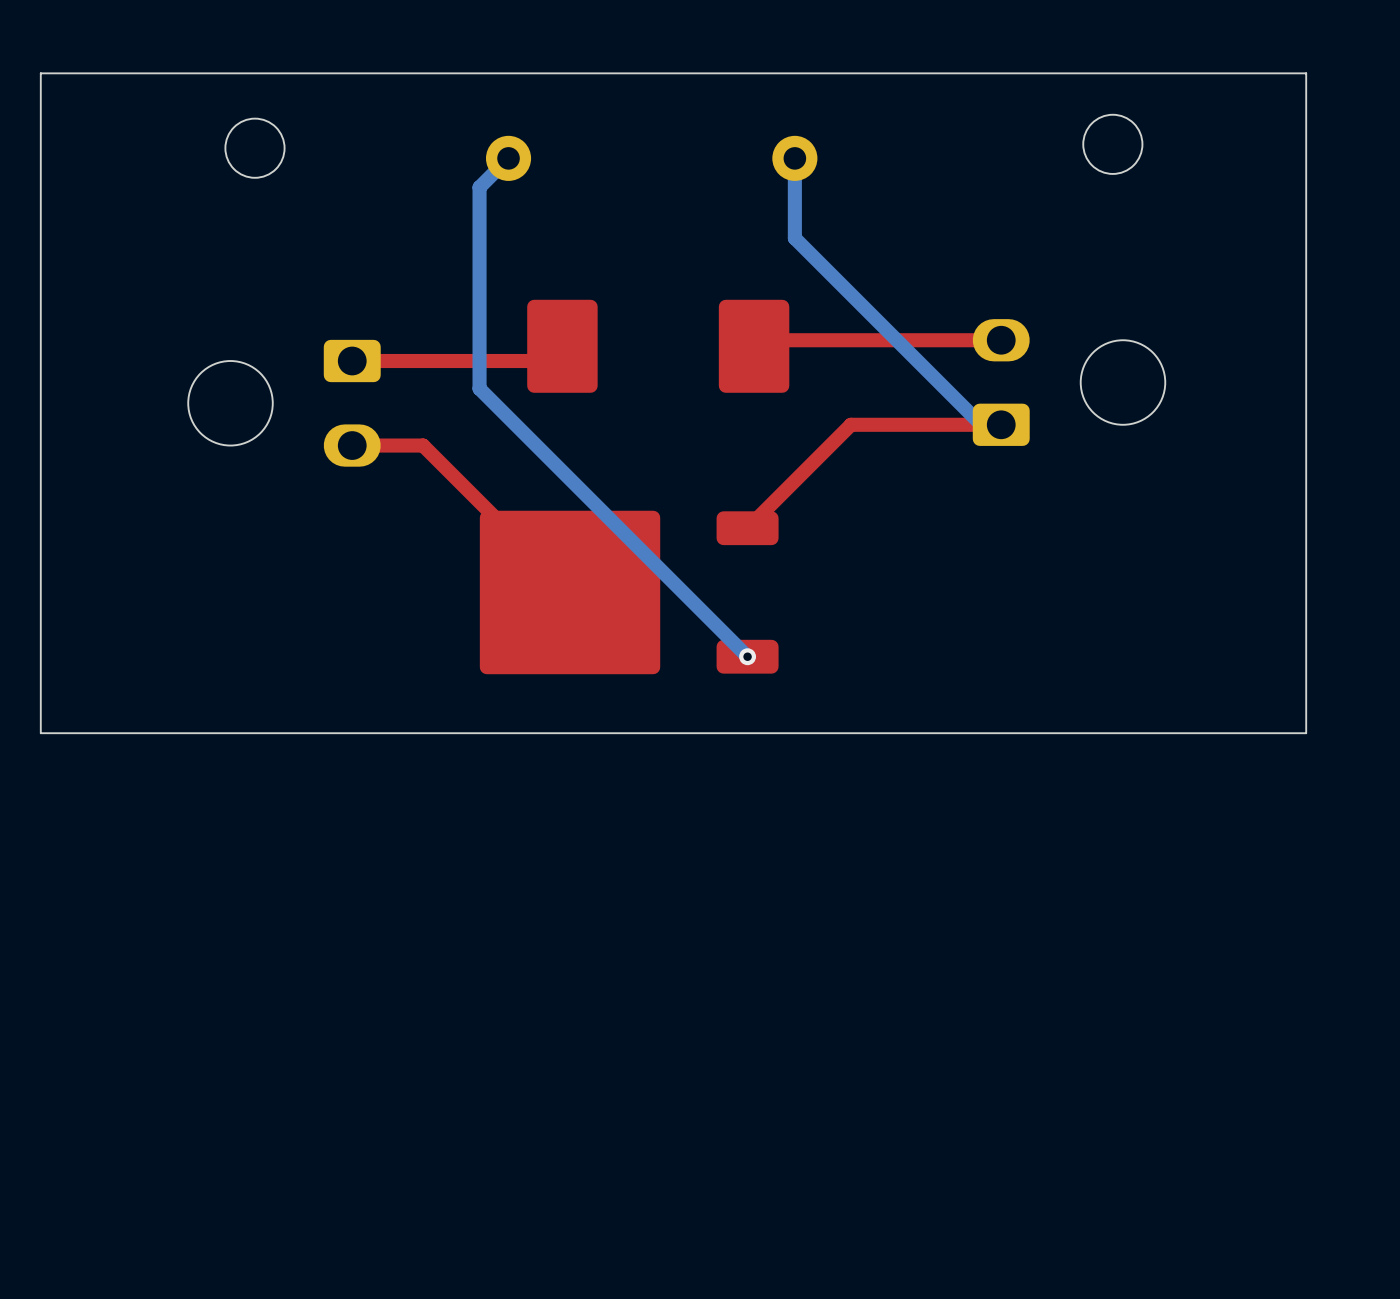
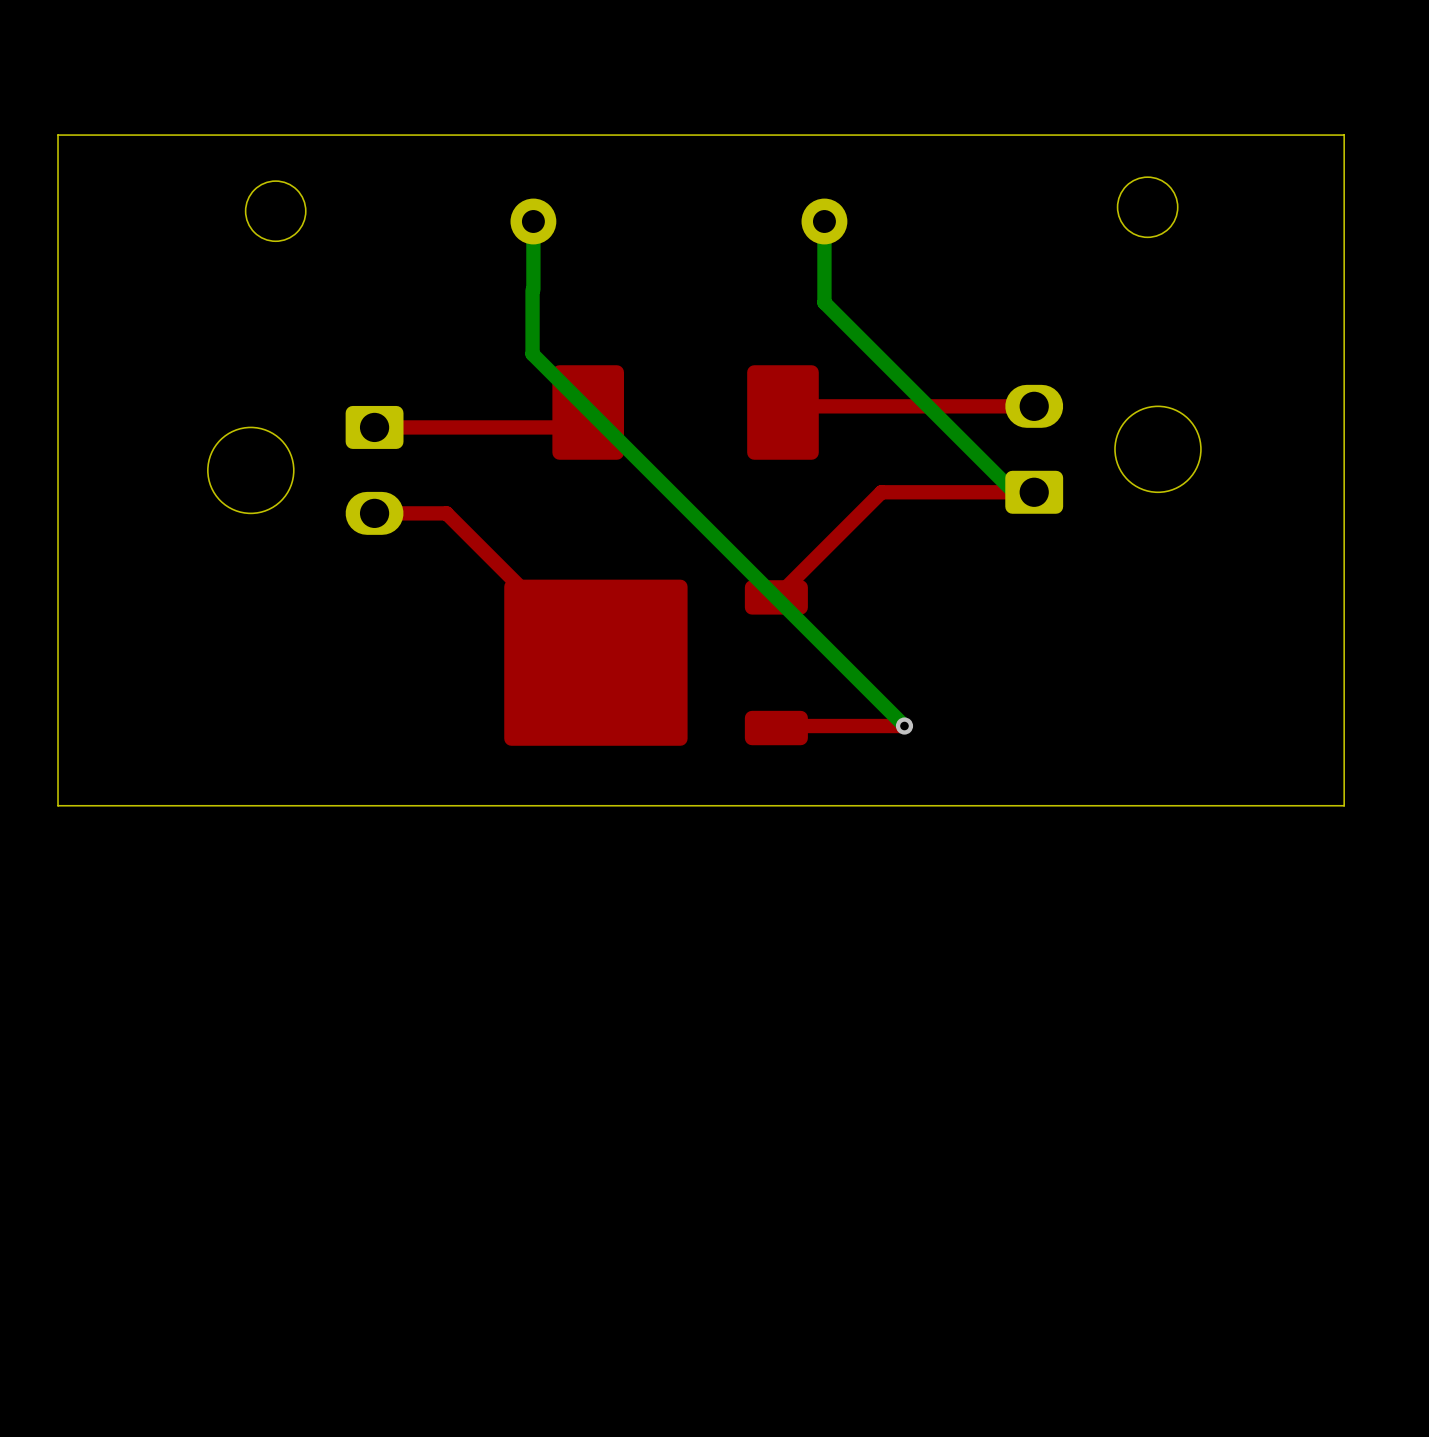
bottom track: (508, 158) (479, 187) (479, 388) (747, 656) -> (533, 221) (533, 289)
bottom track: none -> (532, 290) (532, 354) (903, 726)
top track: none -> (904, 726) (778, 726)
via position: (747, 656) -> (904, 726)

